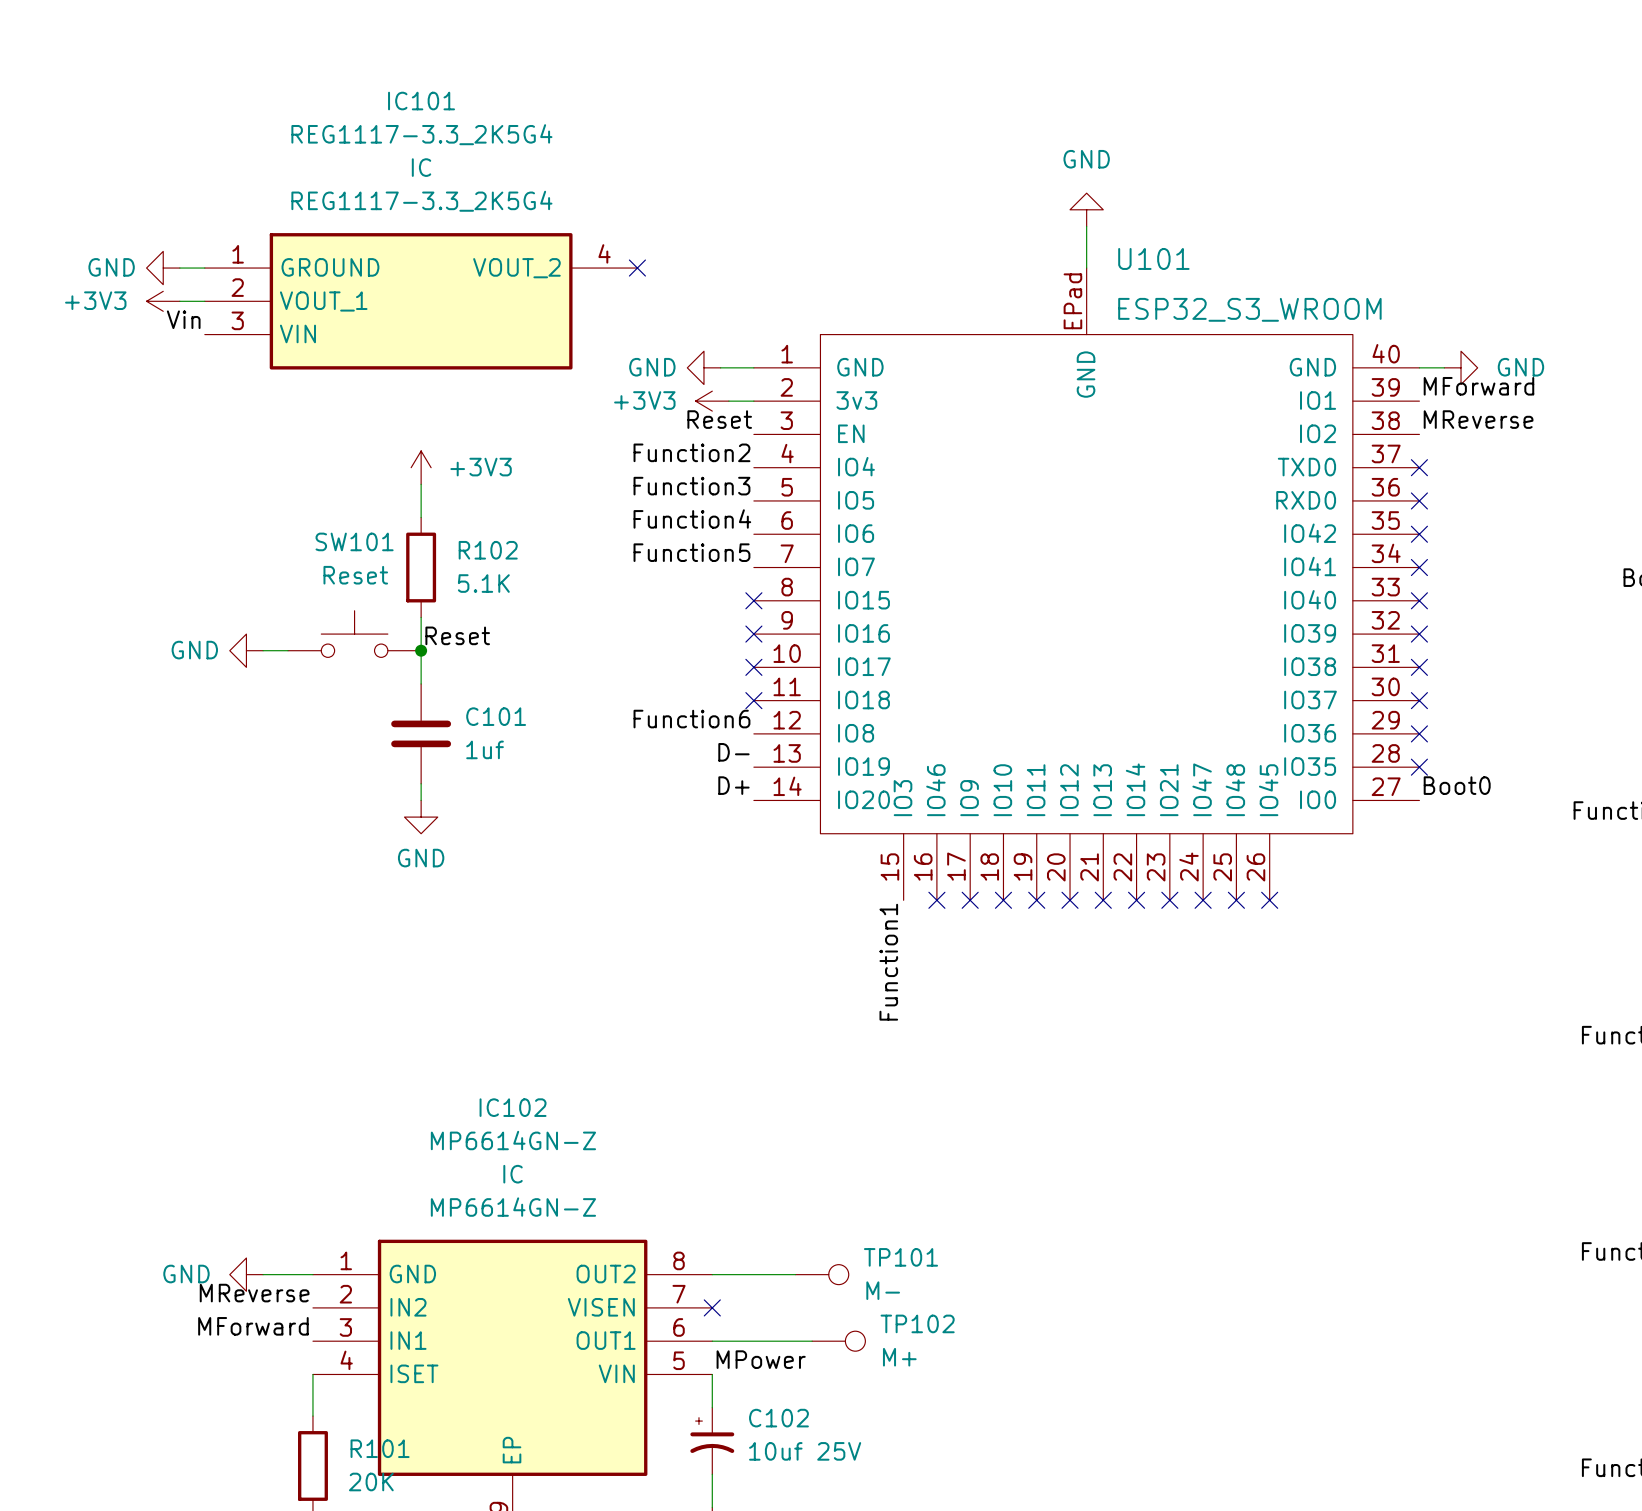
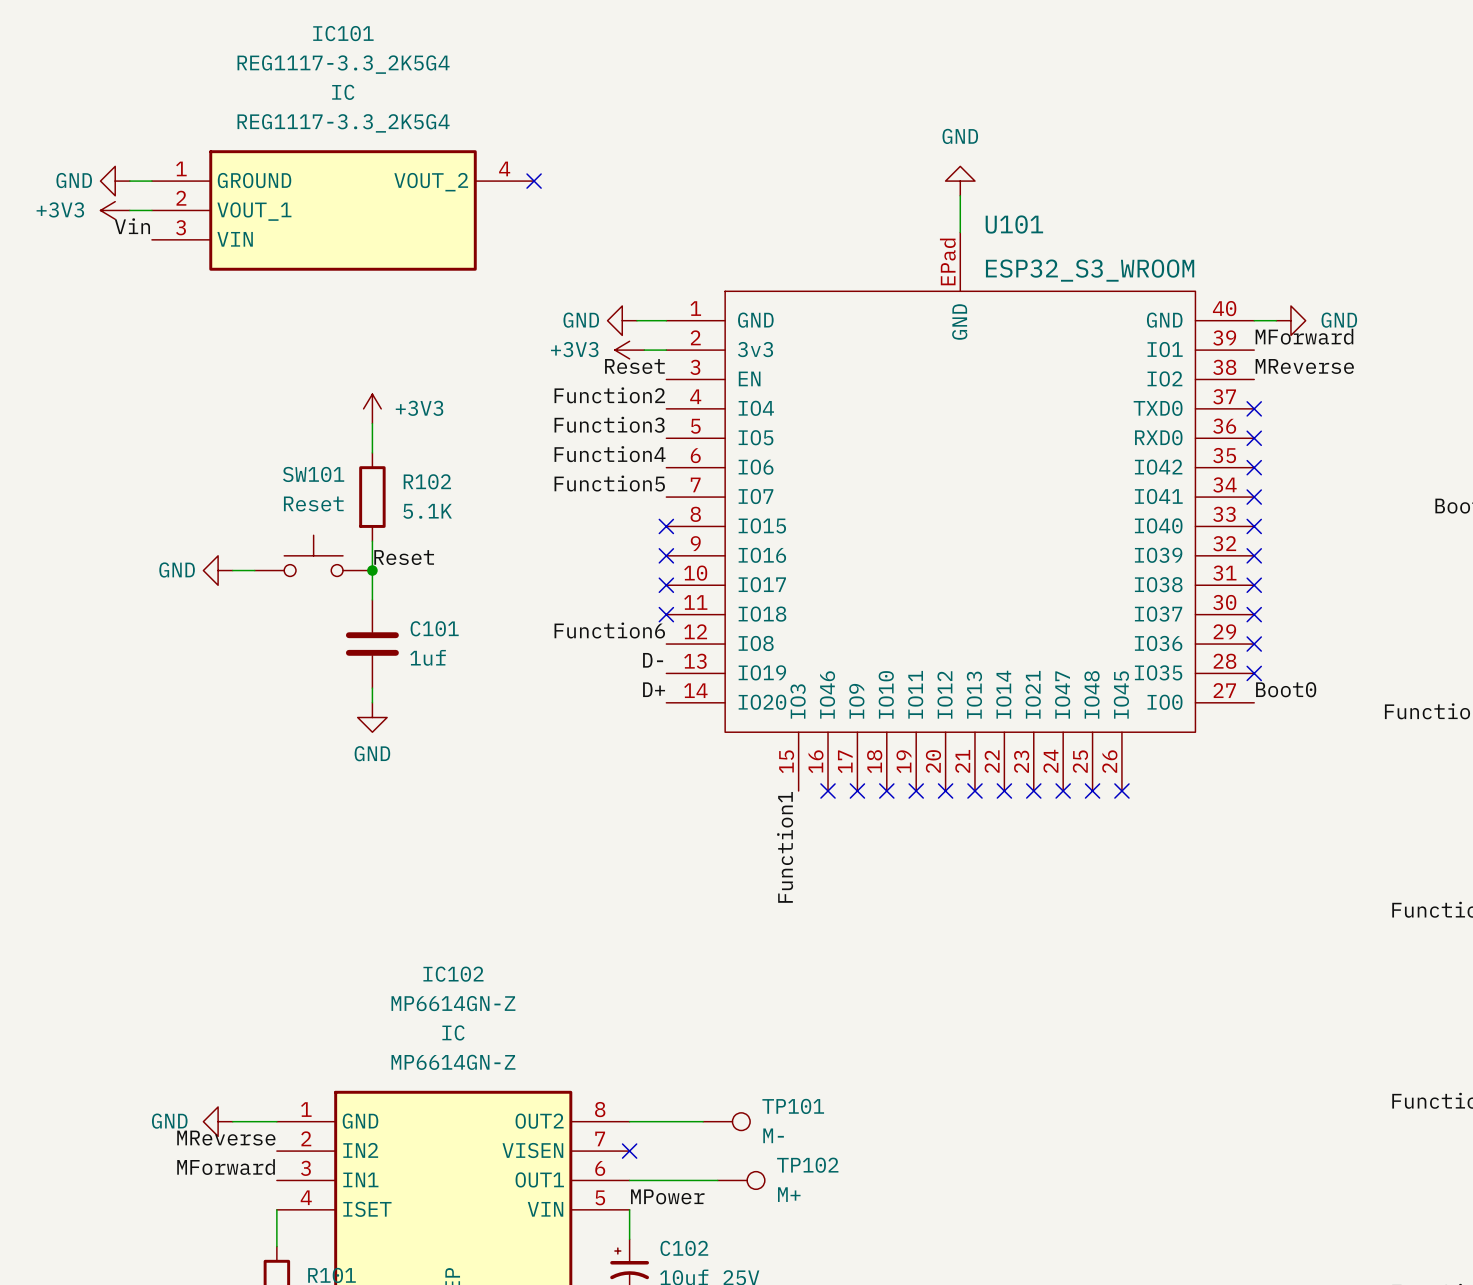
power symbol position: GND (163, 268) -> GND (115, 181)
wire: (179, 268) (204, 268) -> (129, 181) (151, 181)
no-connect mark position: (637, 268) -> (534, 181)
power symbol position: +3V3 (163, 301) -> +3V3 (115, 210)
wire: (179, 301) (204, 301) -> (129, 210) (151, 210)
IC101 position: (421, 301) -> (343, 210)
label position: Vin (183, 319) -> Vin (132, 226)

